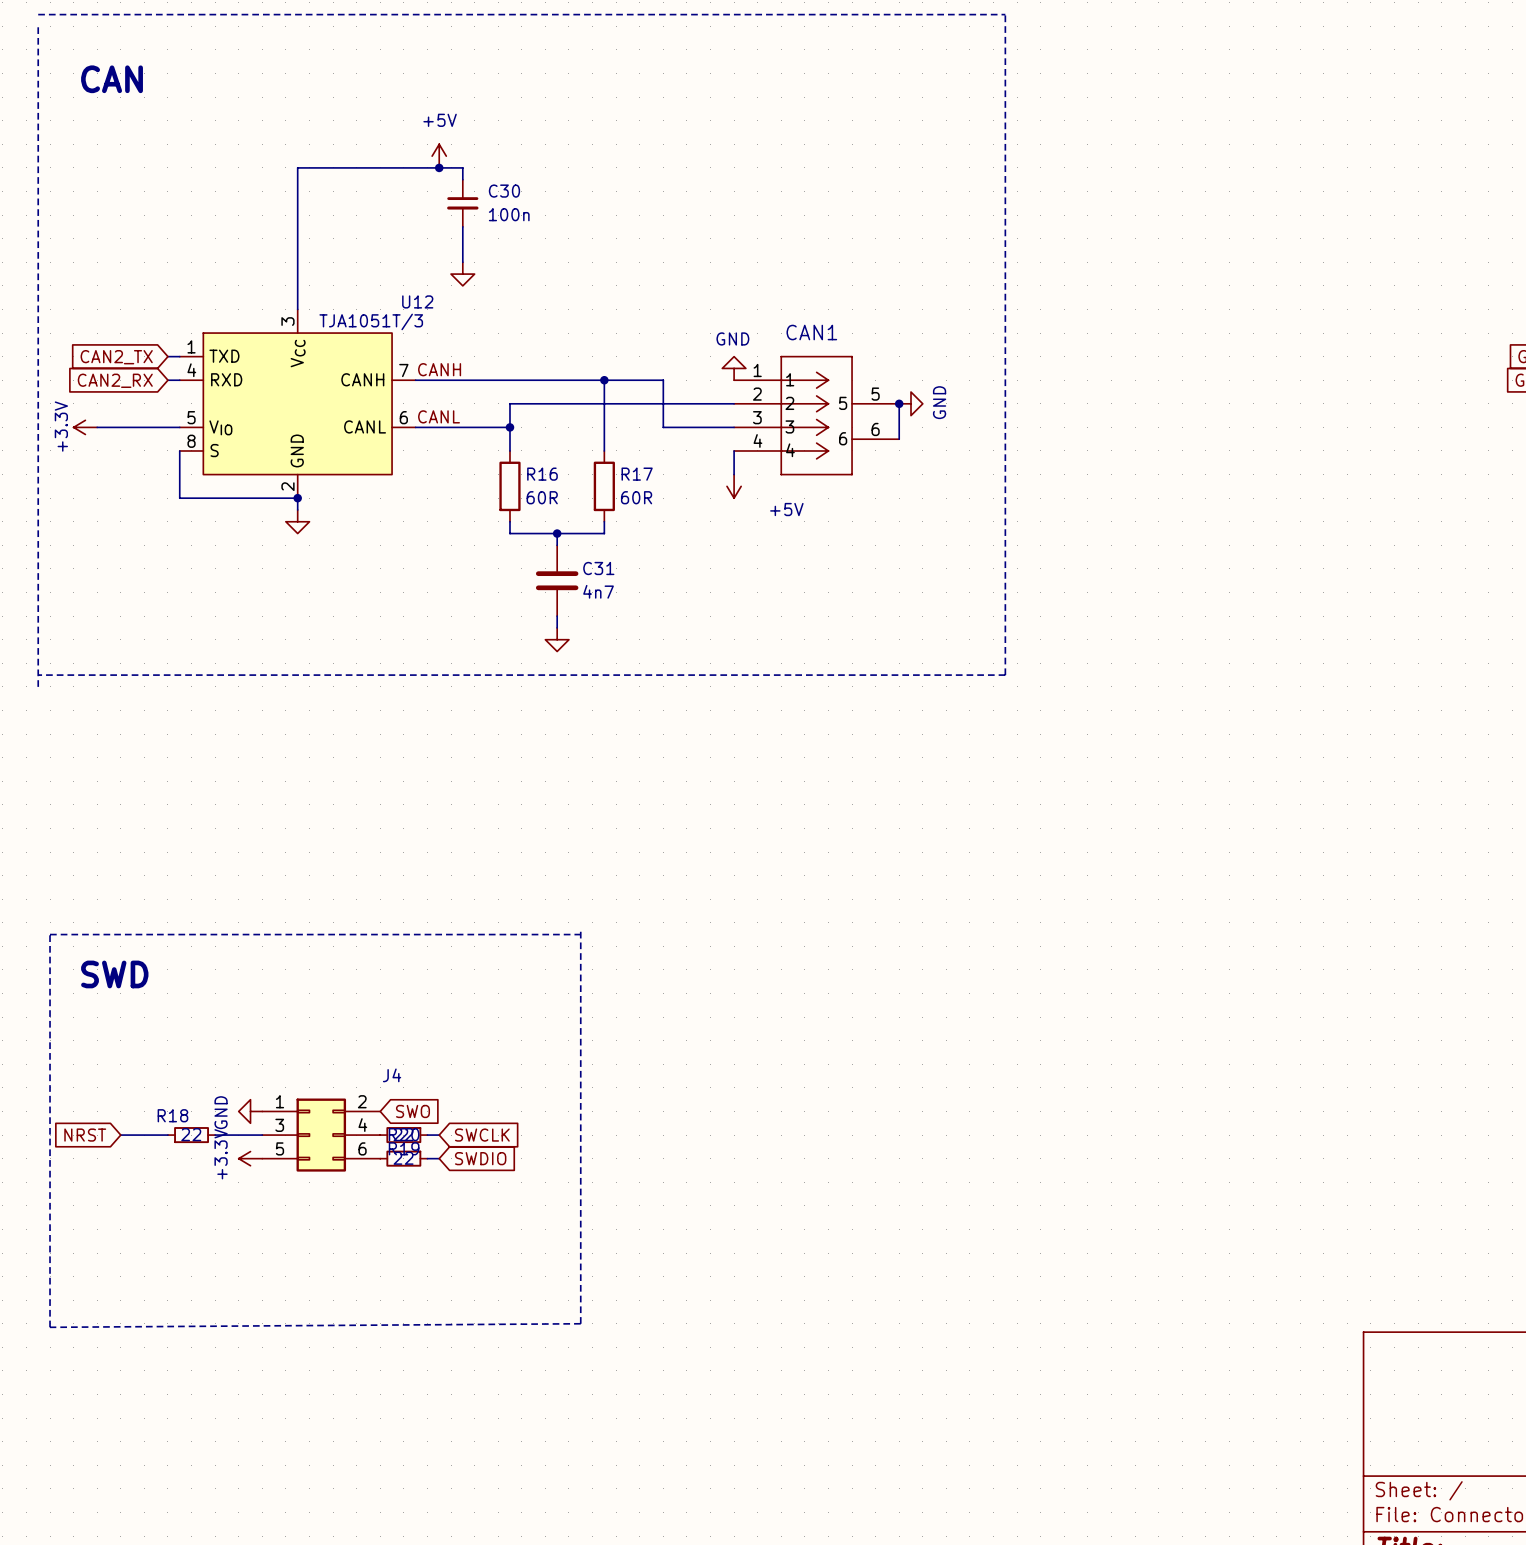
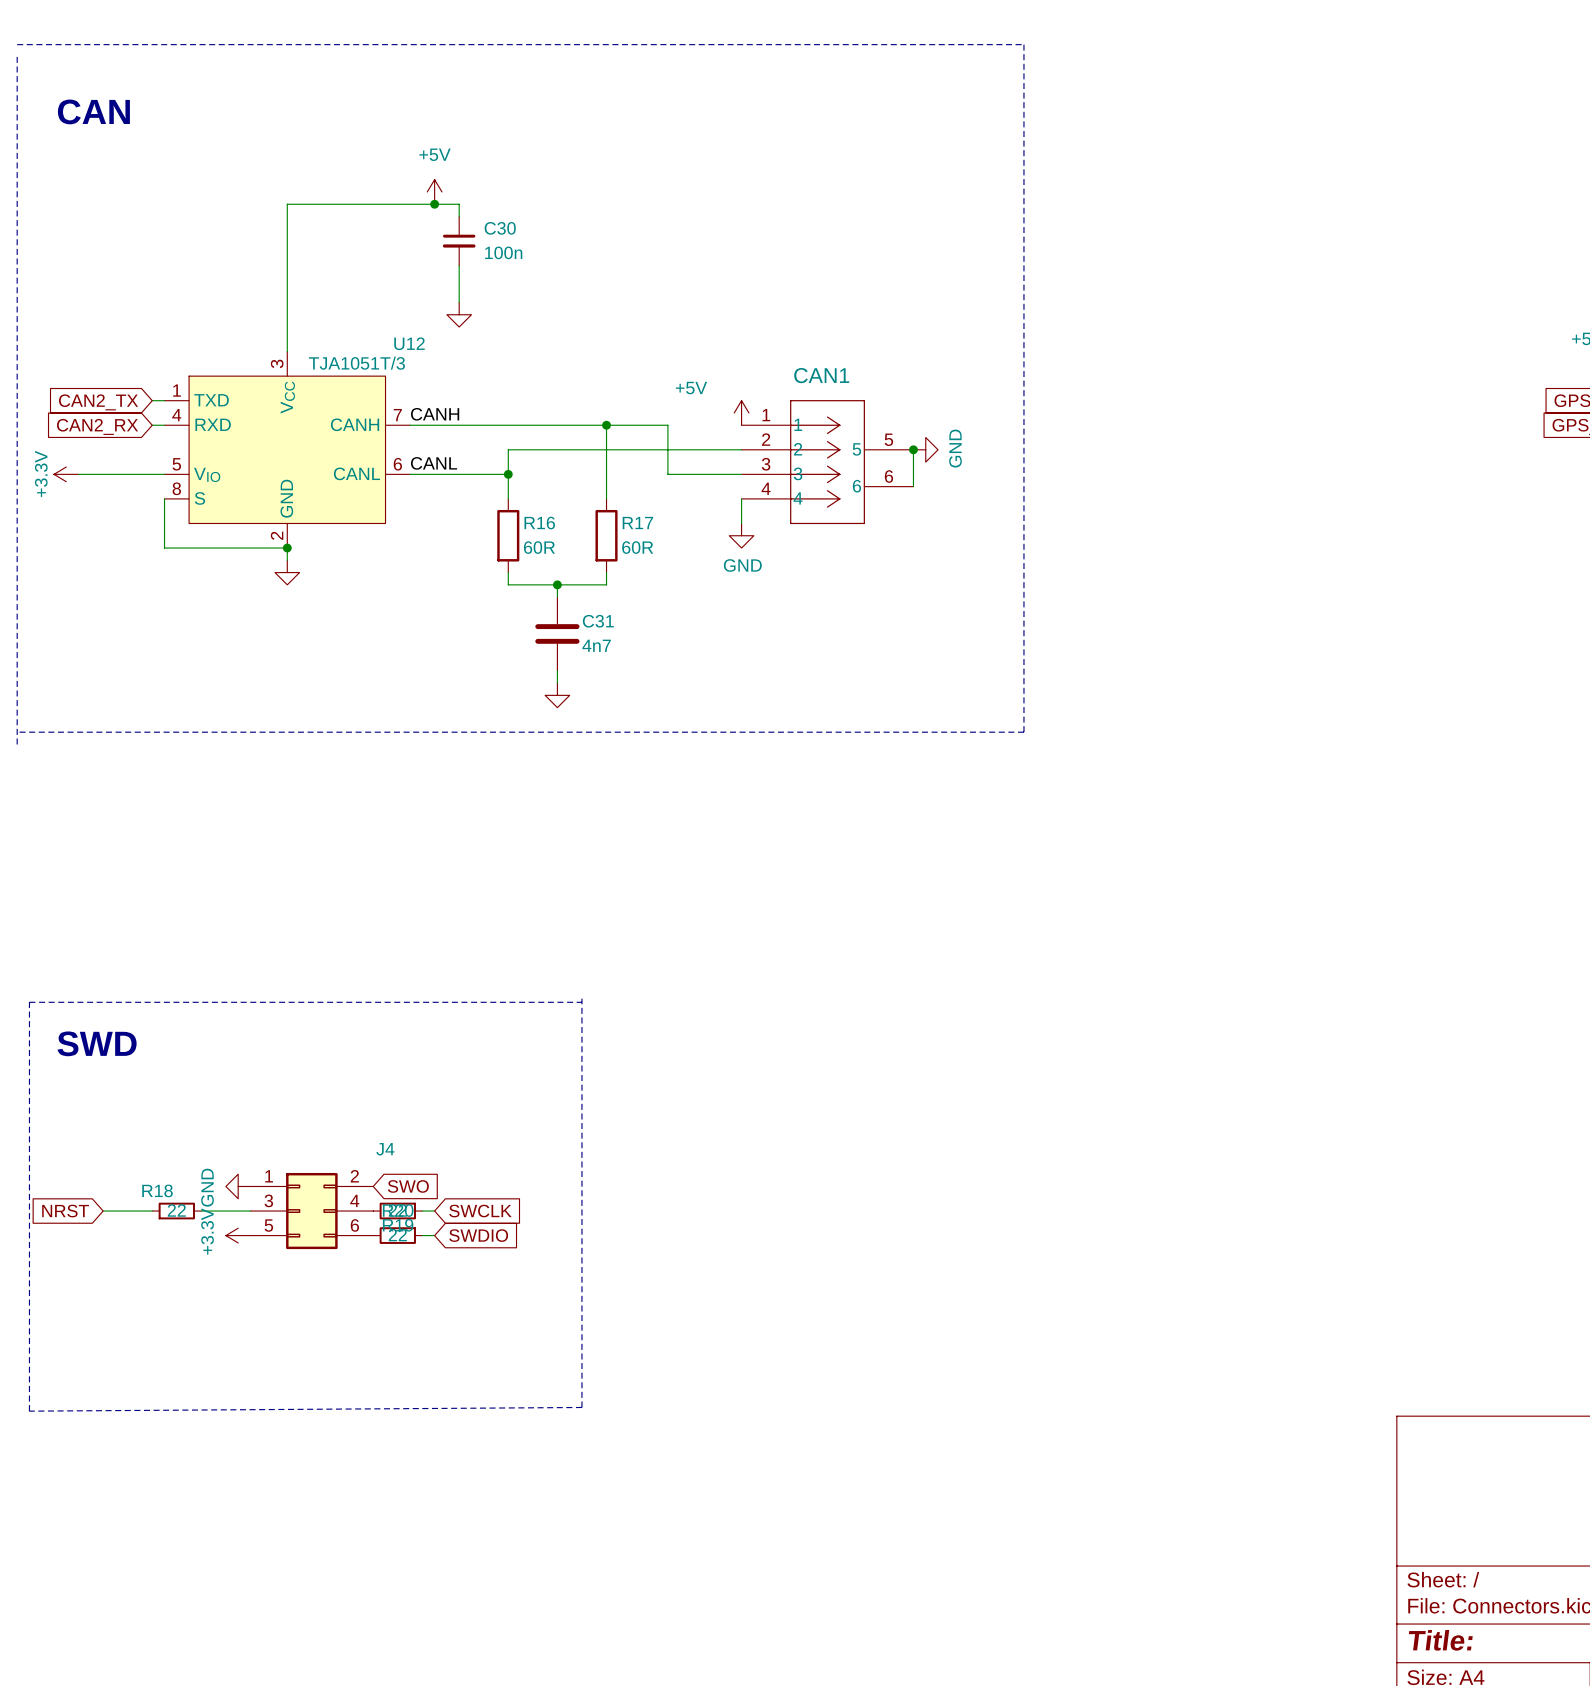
power symbol: GND (734, 368) -> +5V (741, 412)
power symbol: +5V (734, 486) -> GND (741, 535)

